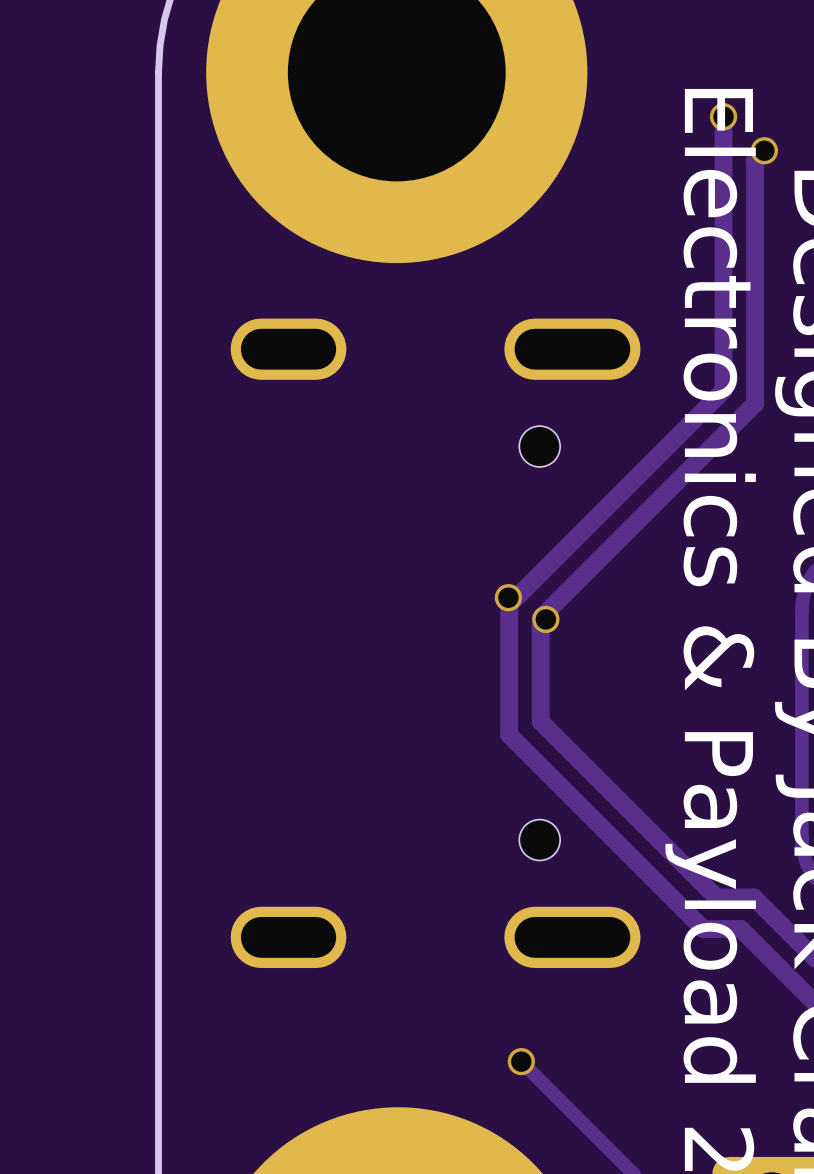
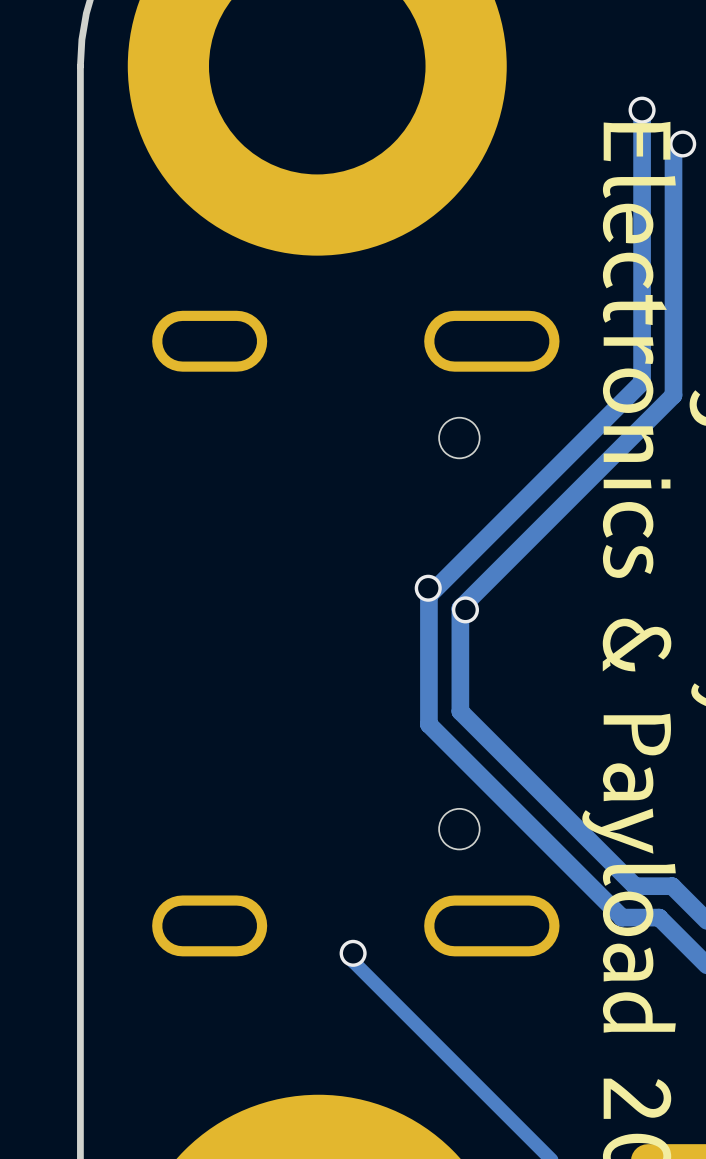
track: none -> (353, 953) (353, 961) (441, 1049)
via position: (521, 1061) -> (353, 953)

